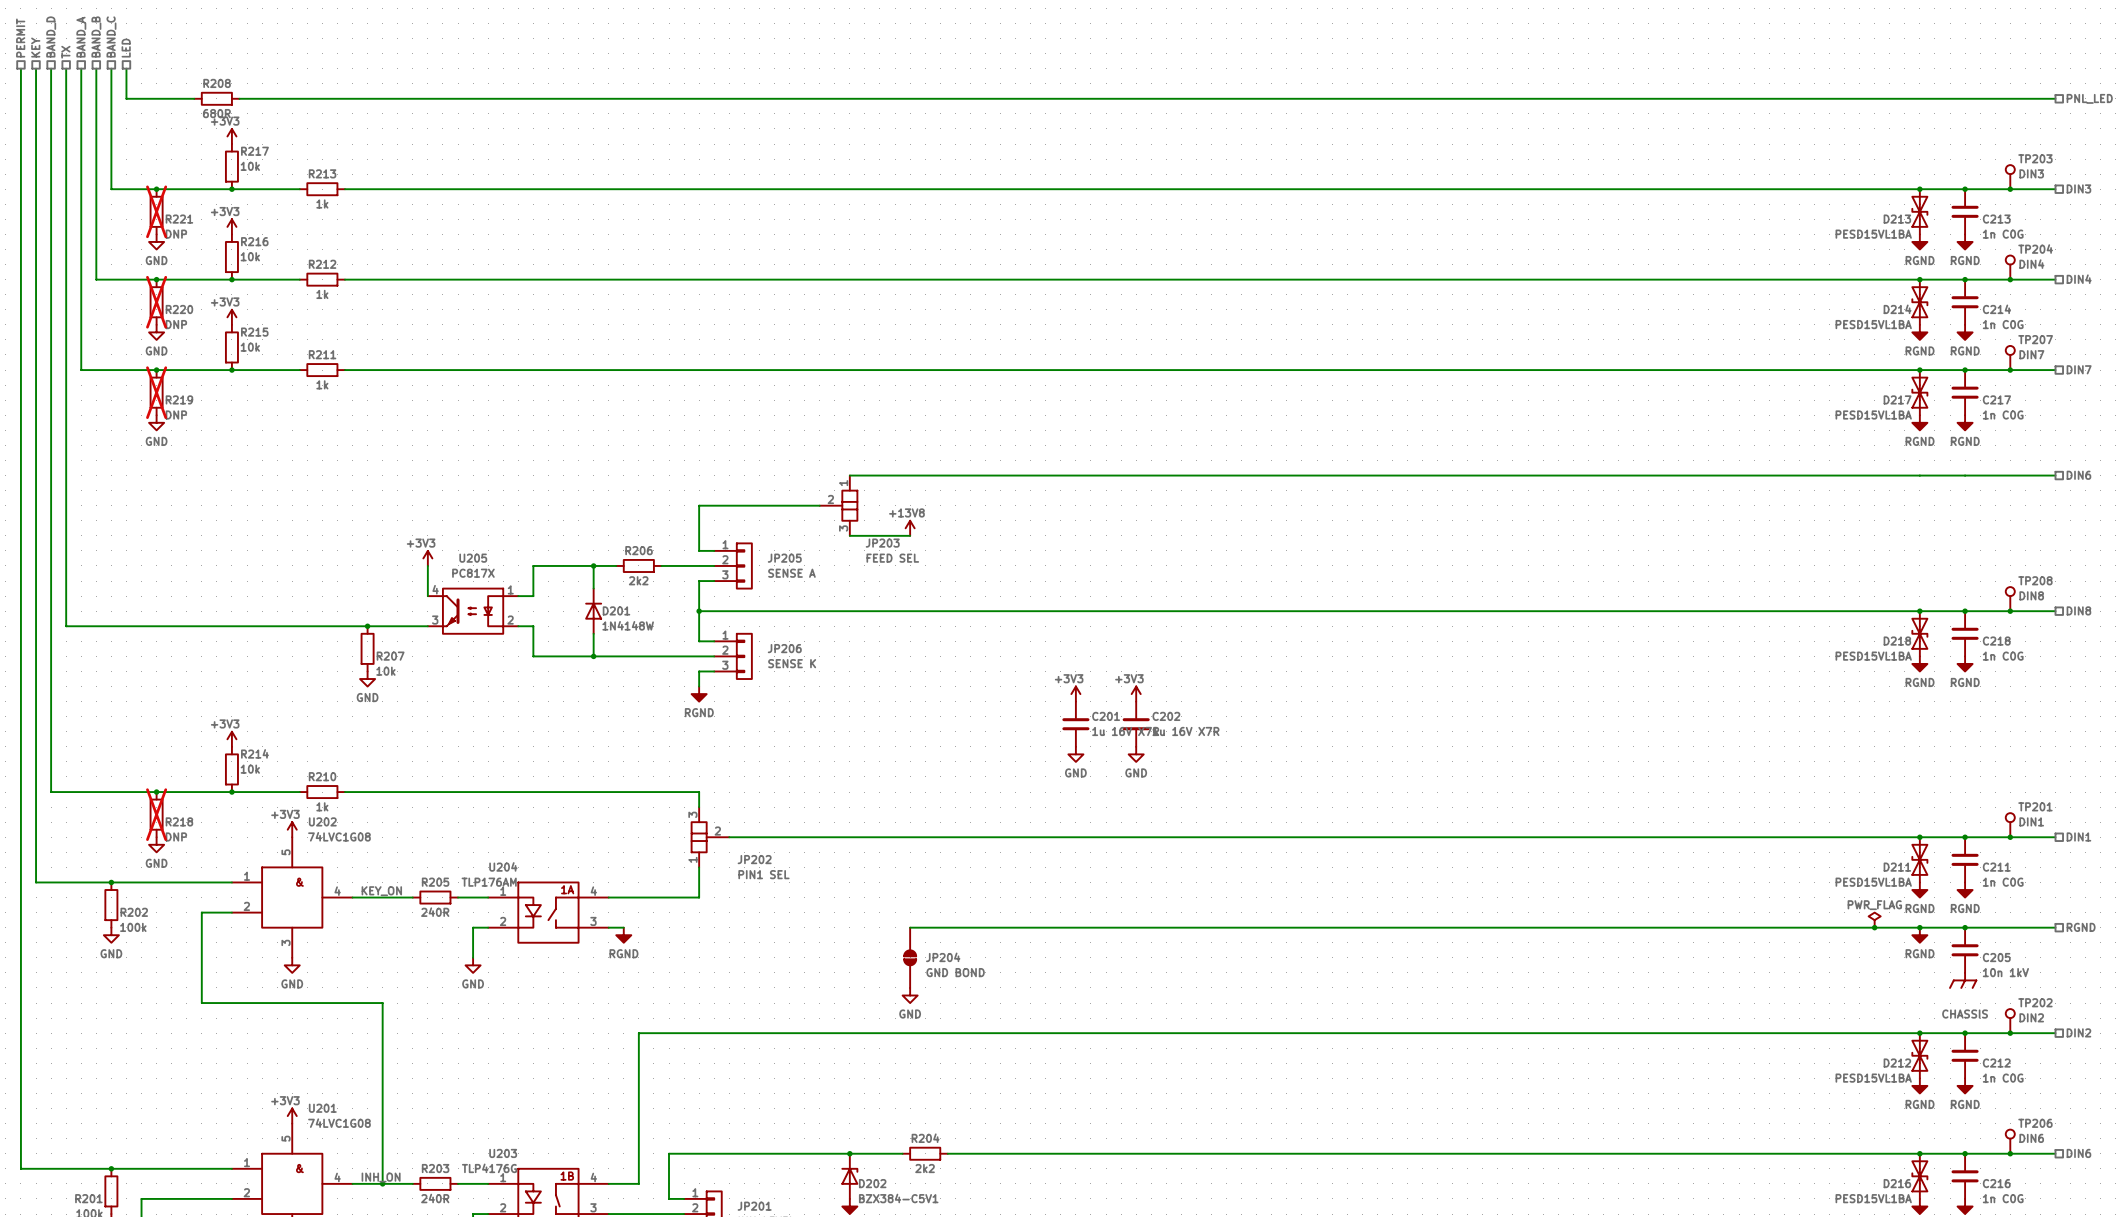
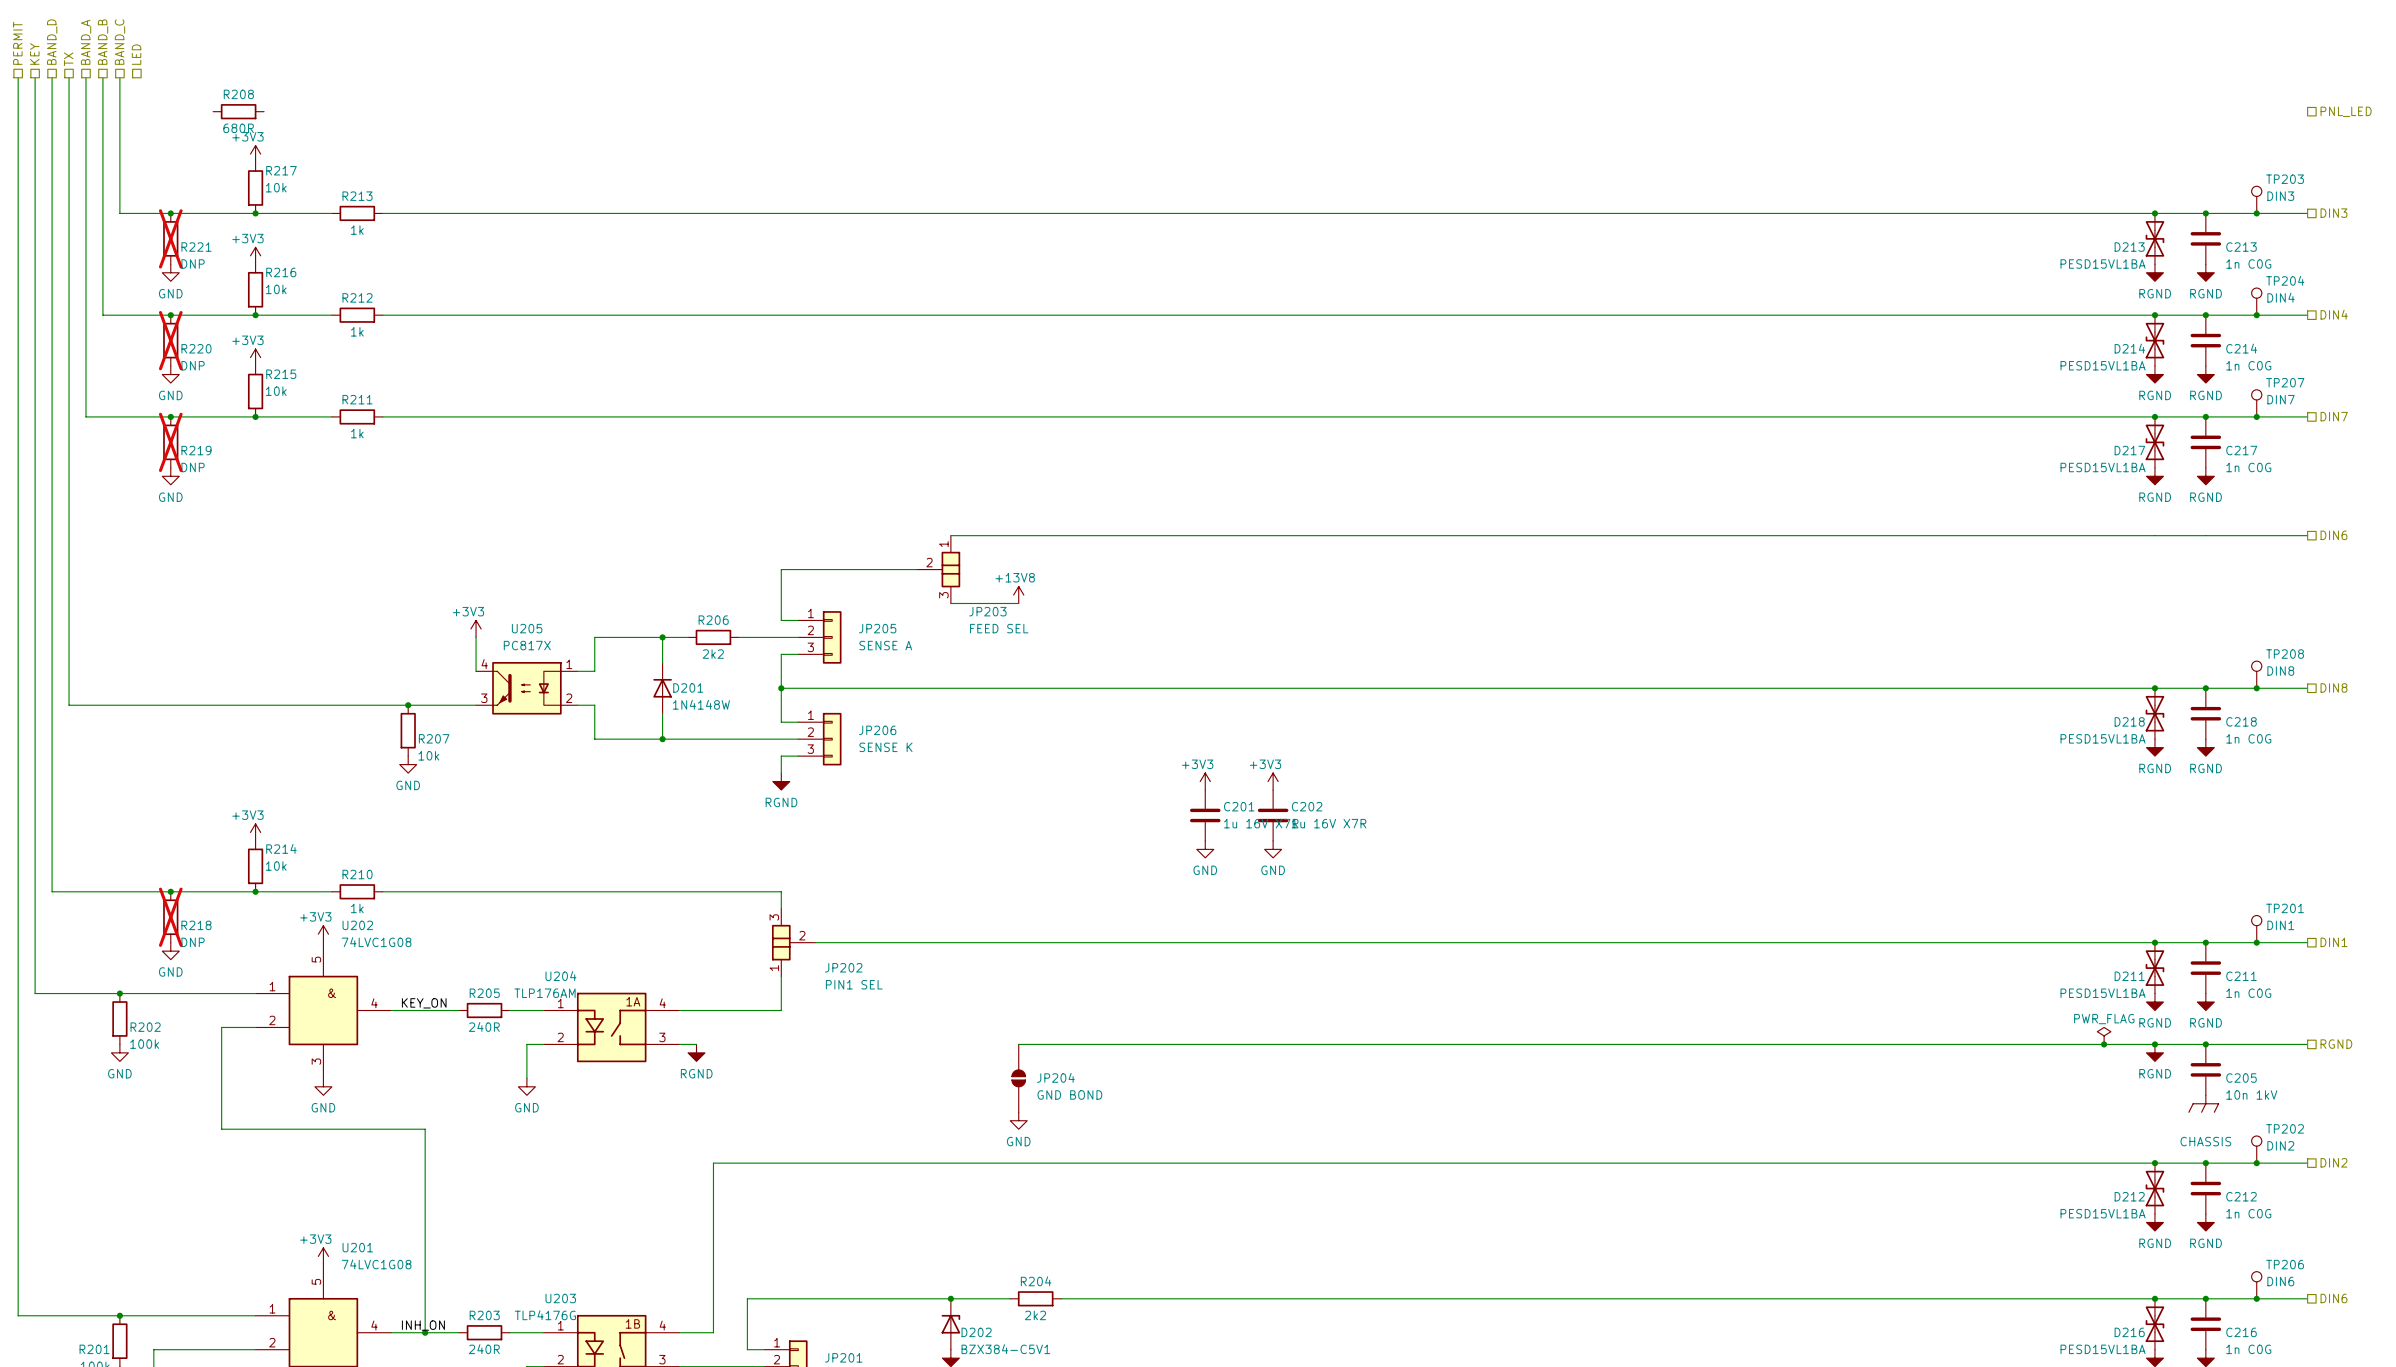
wire: (126, 68) (126, 98) (194, 98) -> none
wire: (239, 98) (2055, 98) -> none

